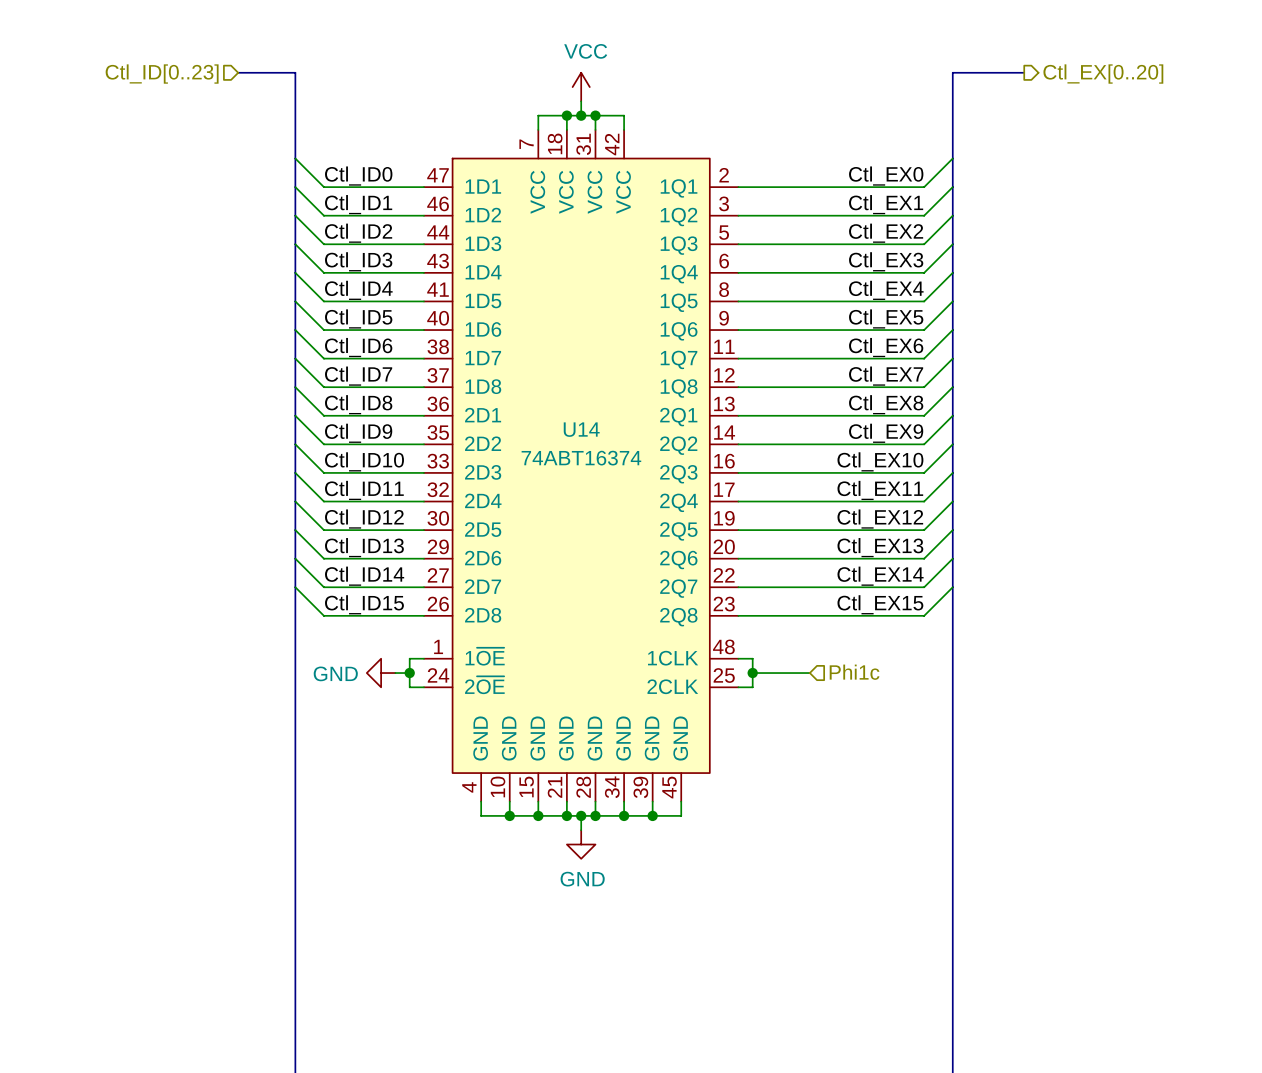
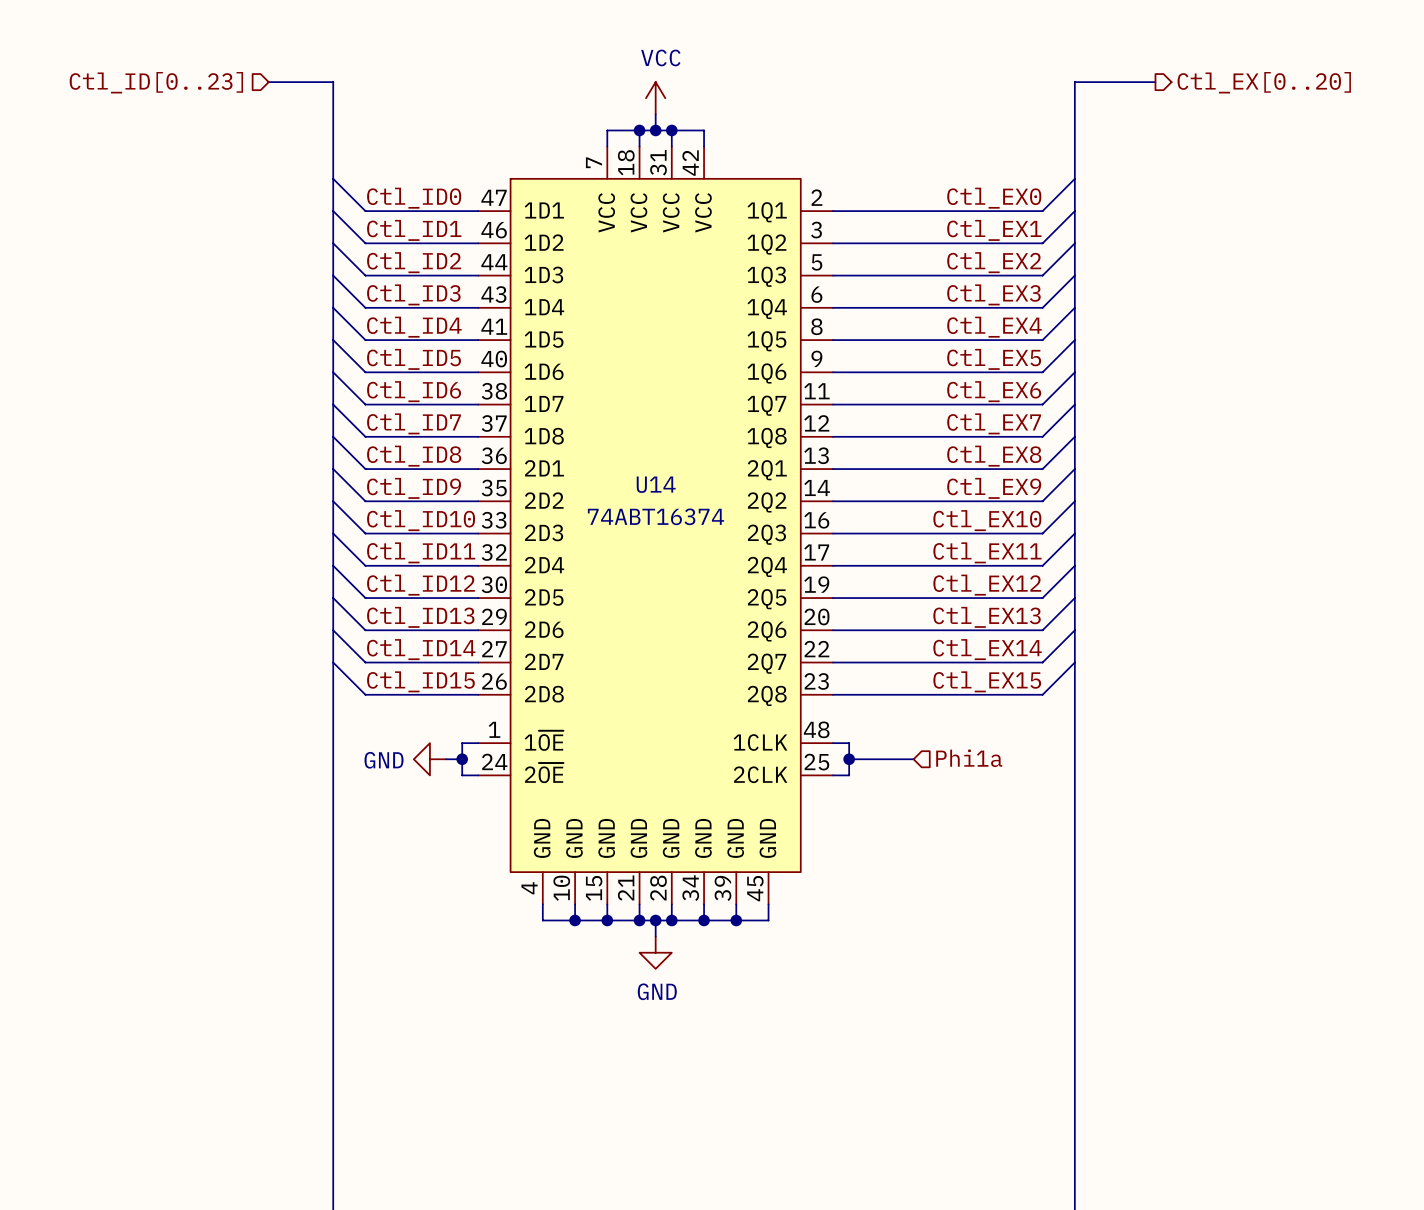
hierarchical label: Phi1c (854, 672) -> Phi1a (969, 758)

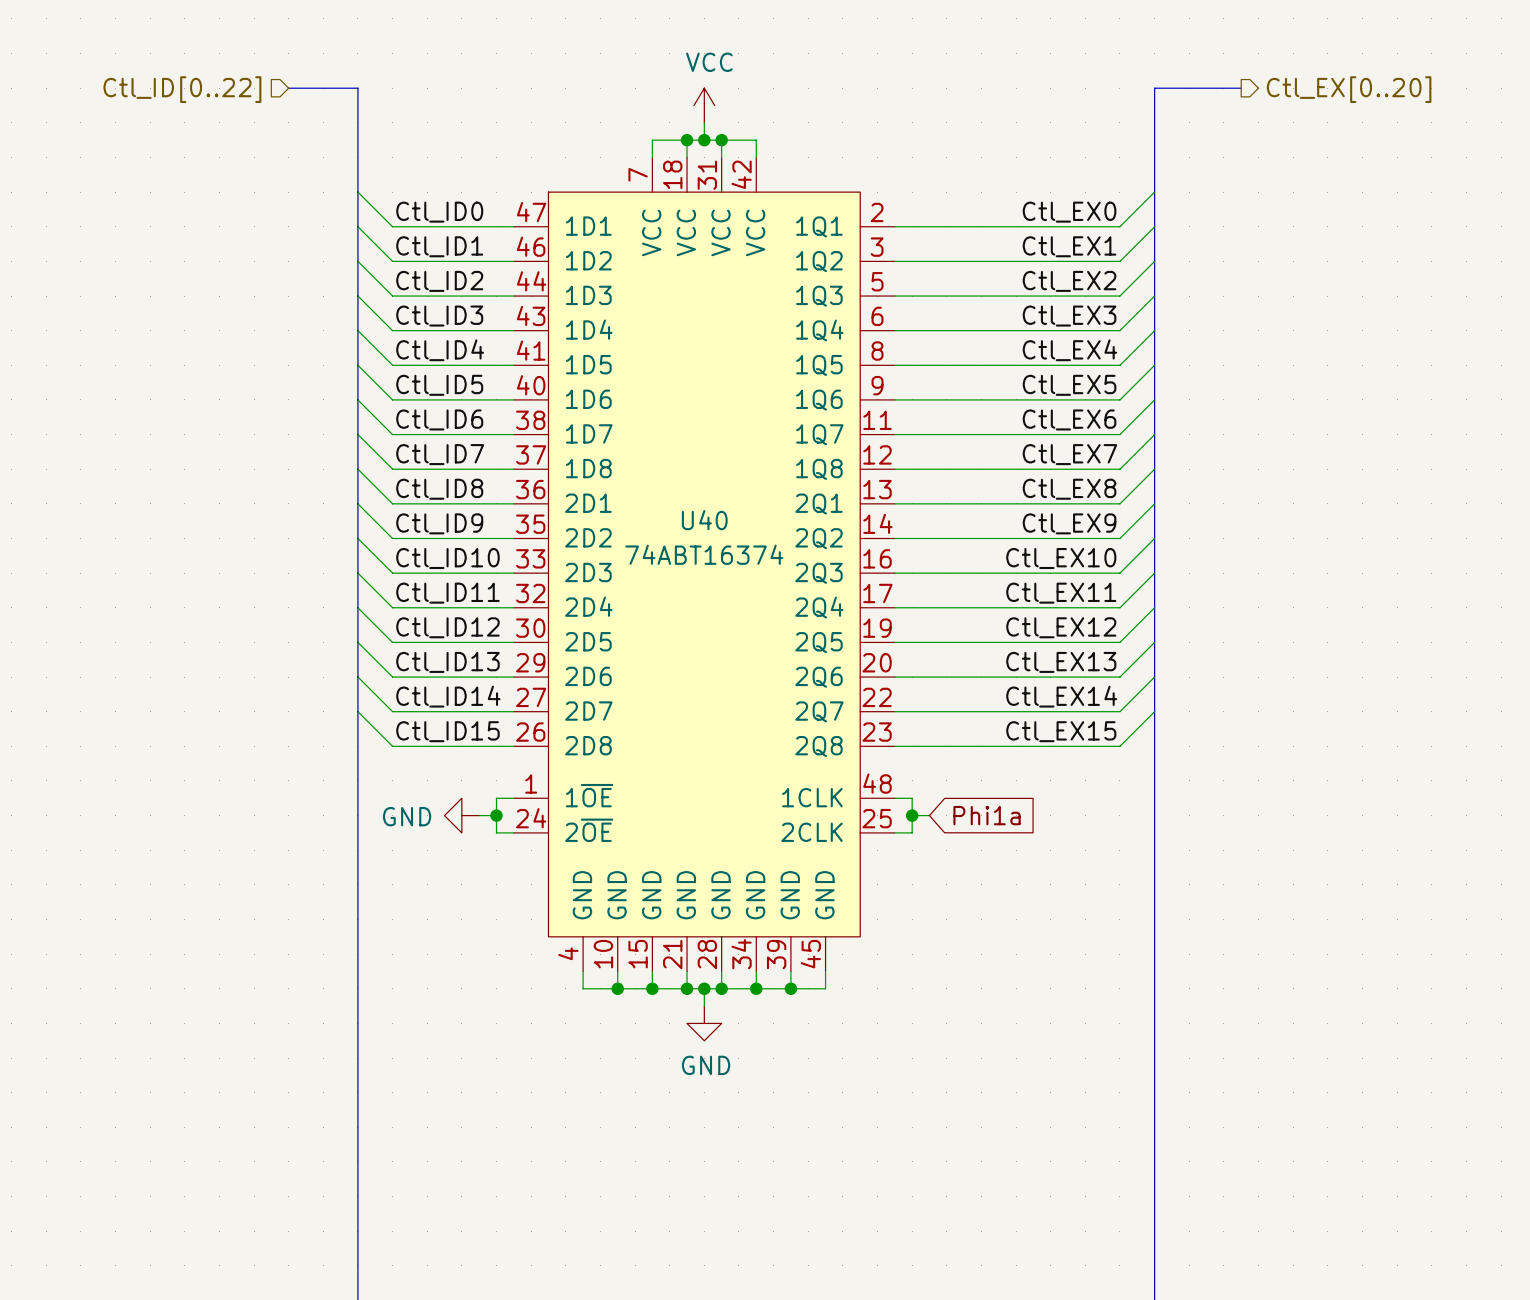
hierarchical label: Ctl_ID[0..23] (156, 82) -> Ctl_ID[0..22] (182, 89)
U14 name: U14 (656, 484) -> U40 (704, 520)
global label: none -> Phi1a (987, 815)
hierarchical label: Phi1a (969, 758) -> none
wire: (865, 759) (913, 759) -> none

